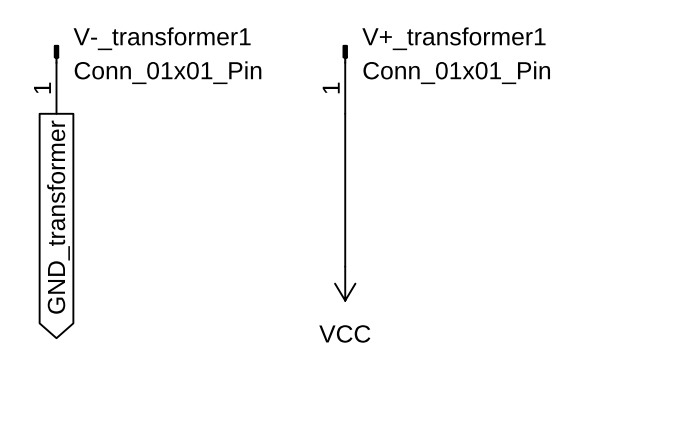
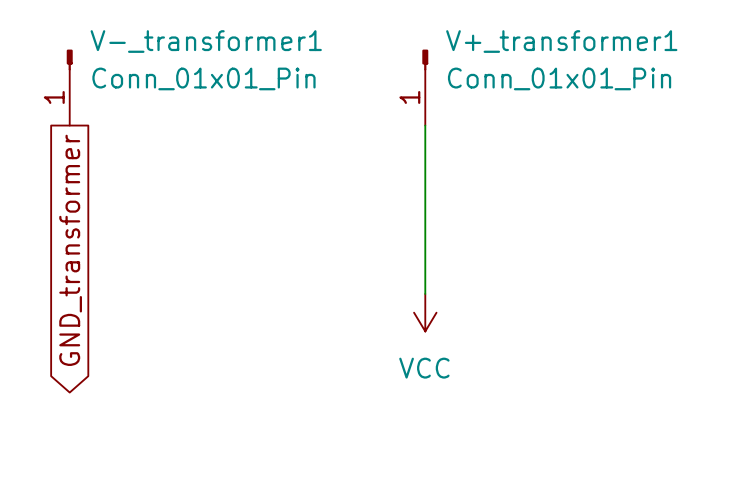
V+_transformer1 position: (345, 79) -> (425, 87)
wire: (345, 113) (345, 266) -> (425, 125) (425, 293)
power symbol position: VCC (345, 283) -> VCC (425, 312)

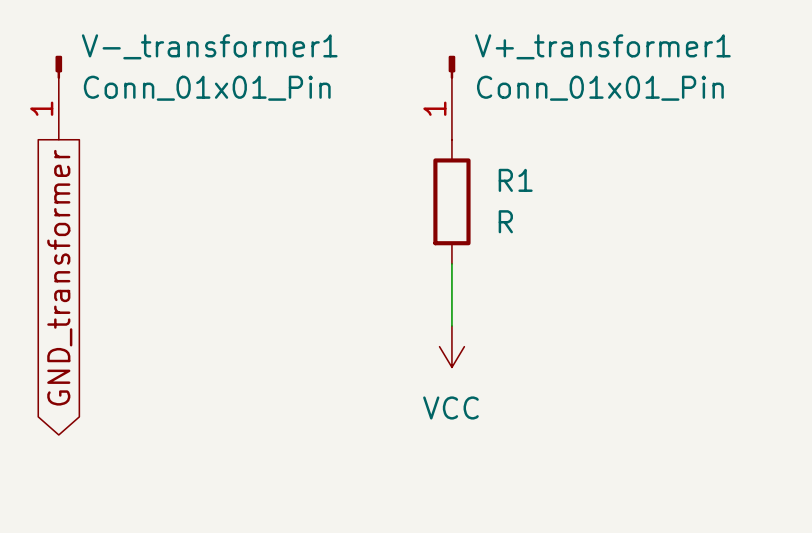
wire: (425, 125) (425, 237) -> none
R1: none -> R (451, 201)

